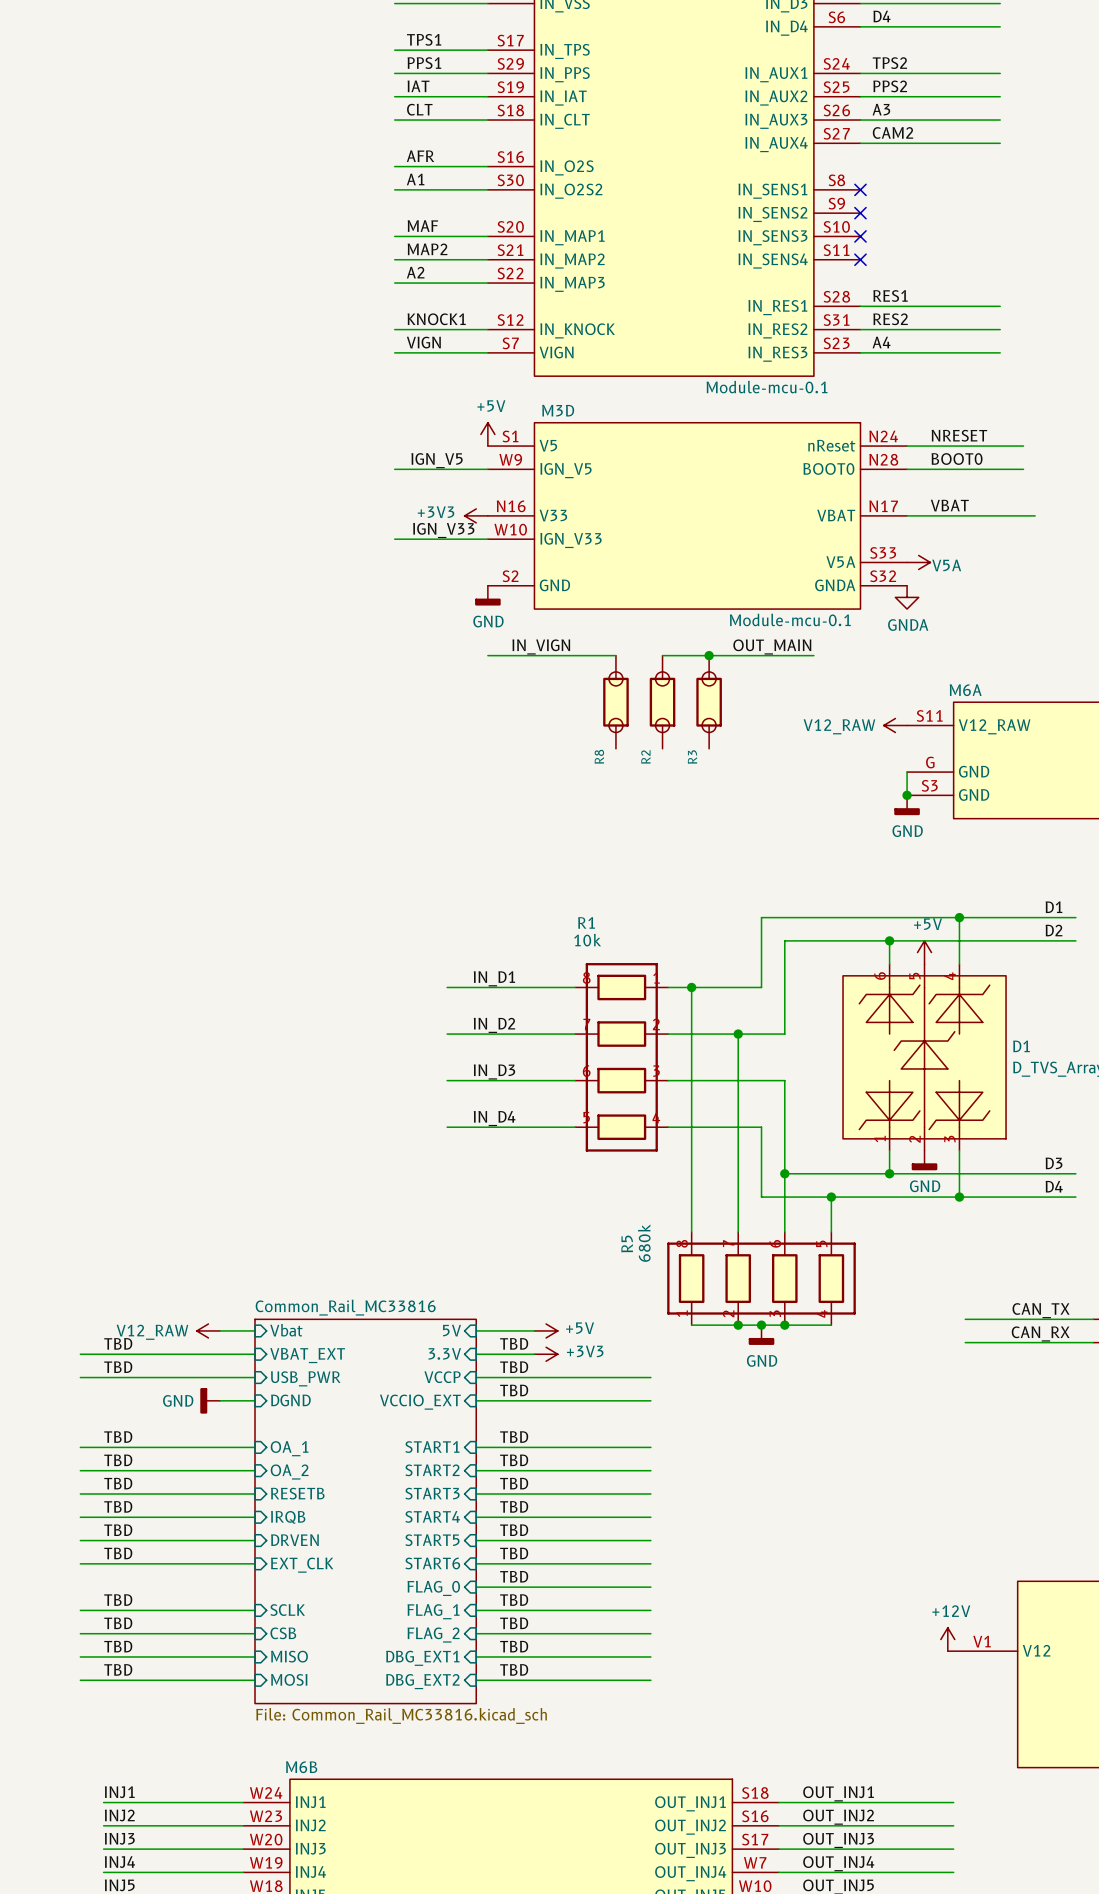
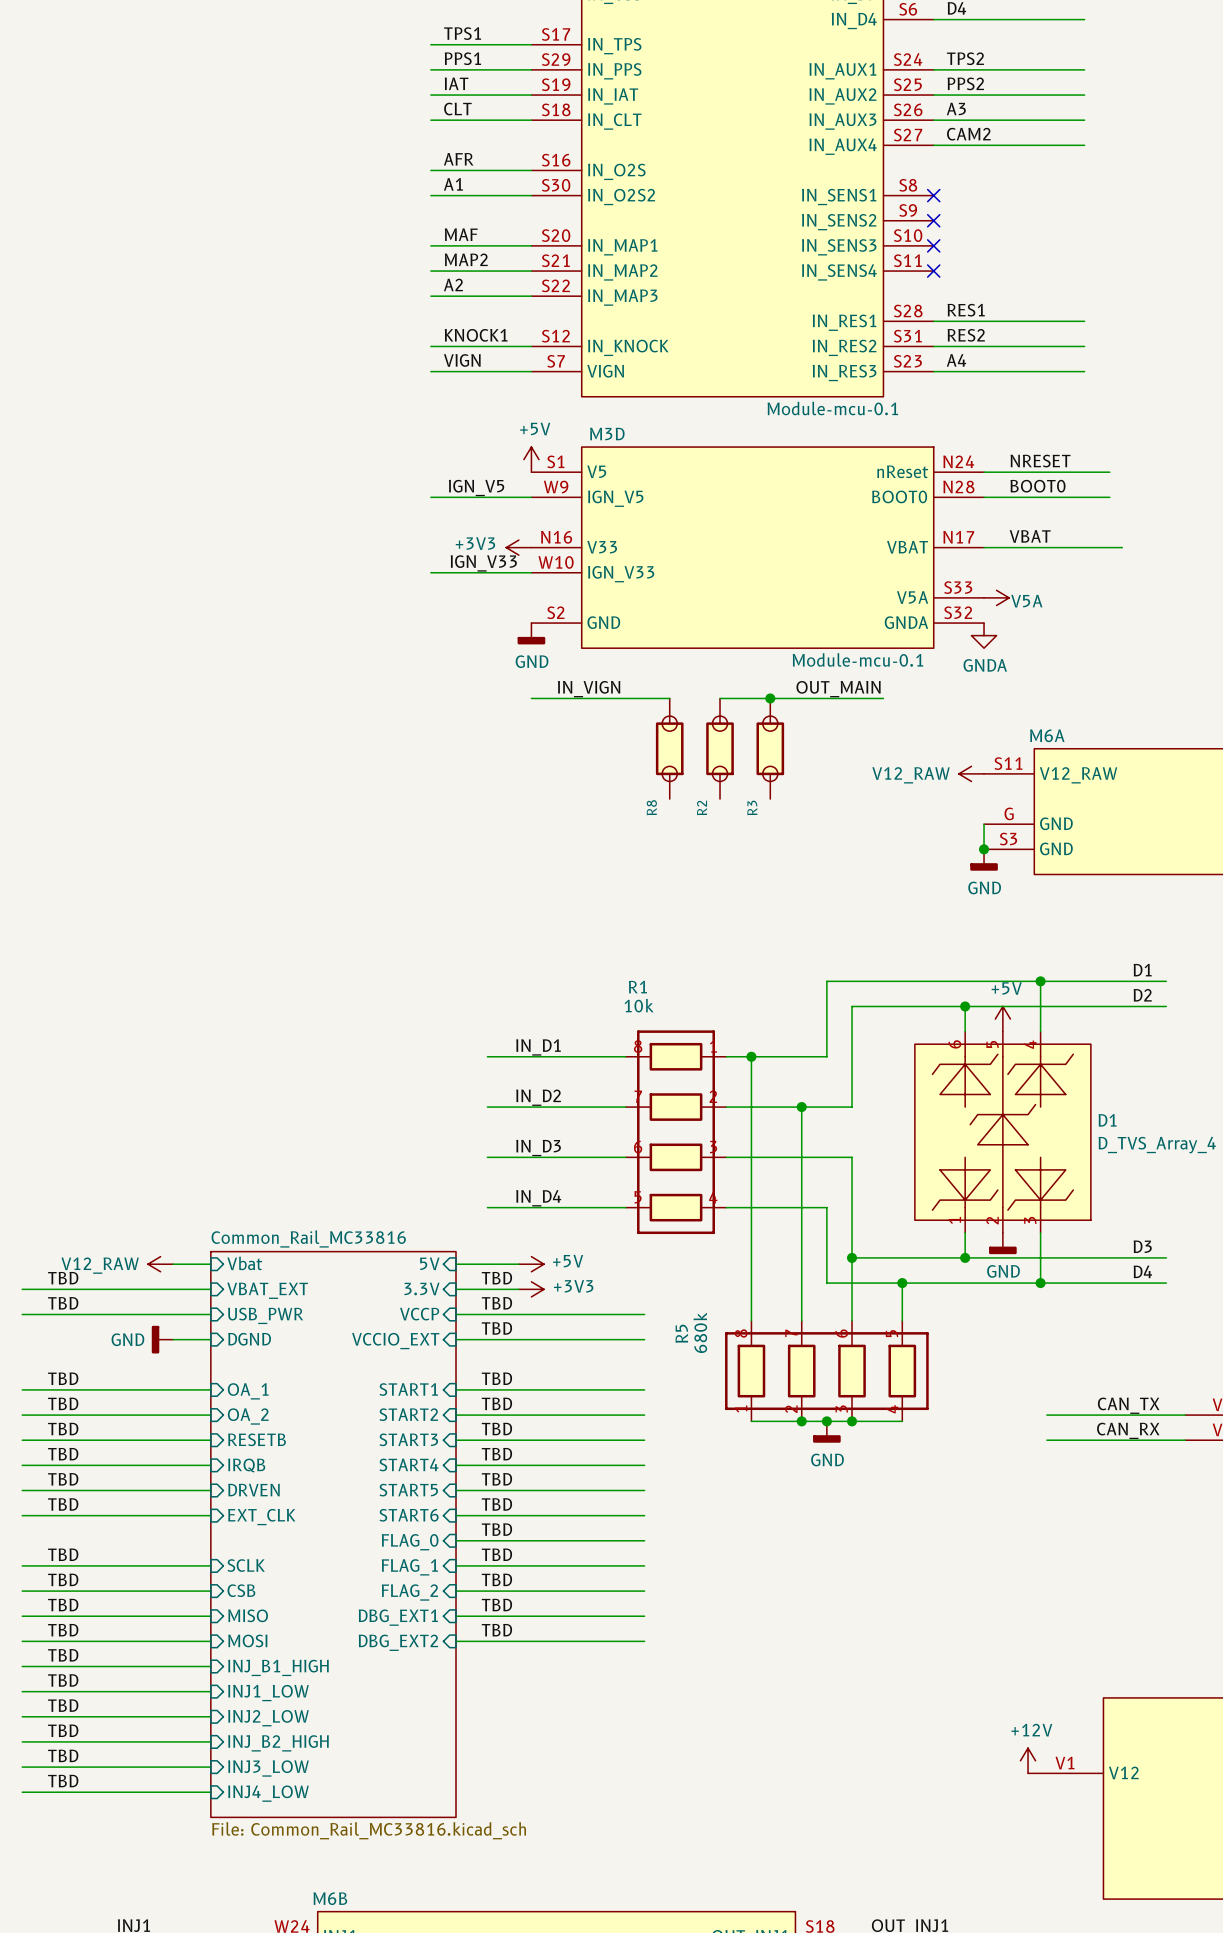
label: none -> TBD (63, 1278)
label: none -> TBD (496, 1278)
label: none -> TBD (63, 1303)
label: none -> TBD (496, 1303)
label: none -> TBD (496, 1328)
label: none -> TBD (63, 1378)
label: none -> TBD (496, 1378)
sheet Common_Rail_MC33816 name position: Common_Rail_MC33816 (345, 1307) -> Common_Rail_MC33816 (308, 1238)
label: none -> TBD (63, 1403)
label: none -> TBD (496, 1403)
sheet Common_Rail_MC33816 shape: [255, 1319, 477, 1704] -> [210, 1251, 457, 1818]
power symbol position: V12_RAW (208, 1330) -> V12_RAW (160, 1264)
wire: (220, 1330) (255, 1330) -> (173, 1264) (210, 1264)
sheet pin position: Vbat (286, 1330) -> Vbat (244, 1263)
sheet pin position: 5V (452, 1330) -> 5V (429, 1263)
wire: (476, 1330) (534, 1330) -> (456, 1264) (518, 1264)
power symbol position: +5V (546, 1330) -> +5V (531, 1264)
label: none -> TBD (63, 1429)
label: none -> TBD (496, 1429)
label: TBD (118, 1343) -> none
label: TBD (514, 1343) -> none
sheet pin position: 3.3V (444, 1353) -> 3.3V (422, 1288)
wire: (80, 1354) (255, 1354) -> (22, 1289) (210, 1289)
wire: (476, 1354) (534, 1354) -> (456, 1289) (518, 1289)
power symbol position: +3V3 (546, 1354) -> +3V3 (531, 1289)
label: none -> TBD (63, 1454)
sheet pin position: VBAT_EXT (307, 1355) -> VBAT_EXT (267, 1290)
label: none -> TBD (496, 1454)
label: TBD (118, 1367) -> none
label: TBD (514, 1367) -> none
wire: (80, 1377) (255, 1377) -> (22, 1314) (210, 1314)
sheet pin position: VCCP (442, 1377) -> VCCP (419, 1314)
wire: (476, 1377) (650, 1377) -> (456, 1314) (644, 1314)
label: none -> TBD (63, 1479)
sheet pin position: USB_PWR (305, 1378) -> USB_PWR (265, 1315)
label: none -> TBD (496, 1479)
label: TBD (514, 1390) -> none
power symbol position: GND (210, 1400) -> GND (162, 1339)
wire: (220, 1400) (255, 1400) -> (173, 1339) (210, 1339)
sheet pin position: DGND (290, 1400) -> DGND (249, 1339)
wire: (476, 1400) (650, 1400) -> (456, 1339) (644, 1339)
label: none -> TBD (63, 1504)
sheet pin position: VCCIO_EXT (420, 1402) -> VCCIO_EXT (395, 1341)
label: none -> TBD (496, 1504)
label: none -> TBD (496, 1529)
label: TBD (118, 1437) -> none
label: TBD (514, 1437) -> none
wire: (80, 1447) (255, 1447) -> (22, 1389) (210, 1389)
sheet pin position: START1 (432, 1447) -> START1 (408, 1389)
wire: (476, 1447) (650, 1447) -> (456, 1389) (644, 1389)
label: none -> TBD (63, 1554)
sheet pin position: OA_1 (289, 1448) -> OA_1 (248, 1391)
label: none -> TBD (496, 1554)
label: TBD (118, 1460) -> none
label: TBD (514, 1460) -> none
wire: (80, 1470) (255, 1470) -> (22, 1415) (210, 1415)
sheet pin position: START2 (432, 1470) -> START2 (408, 1414)
wire: (476, 1470) (650, 1470) -> (456, 1415) (644, 1415)
label: none -> TBD (63, 1579)
label: none -> TBD (496, 1579)
sheet pin position: OA_2 (289, 1472) -> OA_2 (248, 1416)
label: TBD (118, 1483) -> none
label: TBD (514, 1483) -> none
wire: (80, 1493) (255, 1493) -> (22, 1440) (210, 1440)
sheet pin position: RESETB (297, 1493) -> RESETB (256, 1439)
sheet pin position: START3 (432, 1493) -> START3 (408, 1439)
wire: (476, 1493) (650, 1493) -> (456, 1440) (644, 1440)
label: none -> TBD (63, 1605)
label: none -> TBD (496, 1605)
label: TBD (118, 1506) -> none
label: TBD (514, 1506) -> none
sheet pin position: START4 (432, 1516) -> START4 (408, 1464)
wire: (80, 1517) (255, 1517) -> (22, 1465) (210, 1465)
sheet pin position: IRQB (288, 1517) -> IRQB (246, 1465)
wire: (476, 1517) (650, 1517) -> (456, 1465) (644, 1465)
label: none -> TBD (63, 1630)
label: none -> TBD (496, 1630)
label: TBD (118, 1530) -> none
label: TBD (514, 1530) -> none
wire: (80, 1540) (255, 1540) -> (22, 1490) (210, 1490)
sheet pin position: DRVEN (294, 1540) -> DRVEN (253, 1490)
sheet pin position: START5 (432, 1540) -> START5 (408, 1490)
wire: (476, 1540) (650, 1540) -> (456, 1490) (644, 1490)
label: none -> TBD (63, 1655)
wire: none -> (22, 1666) (210, 1666)
label: TBD (118, 1553) -> none
sheet pin: none -> INJ_B1_HIGH (278, 1667)
label: TBD (514, 1553) -> none
wire: (80, 1563) (255, 1563) -> (22, 1515) (210, 1515)
sheet pin position: START6 (432, 1563) -> START6 (409, 1515)
wire: (476, 1563) (650, 1563) -> (456, 1515) (644, 1515)
label: none -> TBD (63, 1680)
sheet pin position: EXT_CLK (302, 1565) -> EXT_CLK (261, 1517)
wire: none -> (22, 1691) (210, 1691)
sheet pin: none -> INJ1_LOW (268, 1693)
label: TBD (514, 1576) -> none
wire: (476, 1587) (650, 1587) -> (456, 1540) (644, 1540)
label: none -> TBD (63, 1705)
sheet pin position: FLAG_0 (433, 1588) -> FLAG_0 (410, 1542)
wire: none -> (22, 1716) (210, 1716)
label: TBD (118, 1600) -> none
sheet pin: none -> INJ2_LOW (268, 1718)
label: TBD (514, 1600) -> none
wire: (80, 1610) (255, 1610) -> (22, 1565) (210, 1565)
sheet pin position: SCLK (287, 1610) -> SCLK (246, 1565)
wire: (476, 1610) (650, 1610) -> (456, 1565) (644, 1565)
label: none -> TBD (63, 1730)
sheet pin position: FLAG_1 (433, 1611) -> FLAG_1 (409, 1567)
wire: none -> (22, 1741) (210, 1741)
label: TBD (118, 1623) -> none
sheet pin: none -> INJ_B2_HIGH (278, 1743)
label: TBD (514, 1623) -> none
wire: (80, 1633) (255, 1633) -> (22, 1591) (210, 1591)
sheet pin position: CSB (283, 1633) -> CSB (241, 1590)
wire: (476, 1633) (650, 1633) -> (456, 1591) (644, 1591)
label: none -> TBD (63, 1755)
sheet pin position: FLAG_2 (433, 1635) -> FLAG_2 (409, 1592)
wire: none -> (22, 1767) (210, 1767)
label: TBD (118, 1646) -> none
sheet pin: none -> INJ3_LOW (268, 1768)
label: TBD (514, 1646) -> none
wire: (80, 1656) (255, 1656) -> (22, 1616) (210, 1616)
sheet pin position: MISO (289, 1656) -> MISO (248, 1615)
wire: (476, 1656) (650, 1656) -> (456, 1616) (644, 1616)
label: none -> TBD (63, 1781)
sheet pin position: DBG_EXT1 (422, 1658) -> DBG_EXT1 (398, 1617)
wire: none -> (22, 1792) (210, 1792)
label: TBD (118, 1669) -> none
sheet pin: none -> INJ4_LOW (268, 1793)
label: TBD (514, 1669) -> none
sheet pin position: MOSI (289, 1679) -> MOSI (247, 1640)
wire: (80, 1680) (255, 1680) -> (22, 1641) (210, 1641)
wire: (476, 1680) (650, 1680) -> (456, 1641) (644, 1641)
sheet pin position: DBG_EXT2 (422, 1681) -> DBG_EXT2 (398, 1642)
sheet Common_Rail_MC33816 value position: File: Common_Rail_MC33816.kicad_sch (401, 1715) -> File: Common_Rail_MC33816.kicad_sch (369, 1830)

